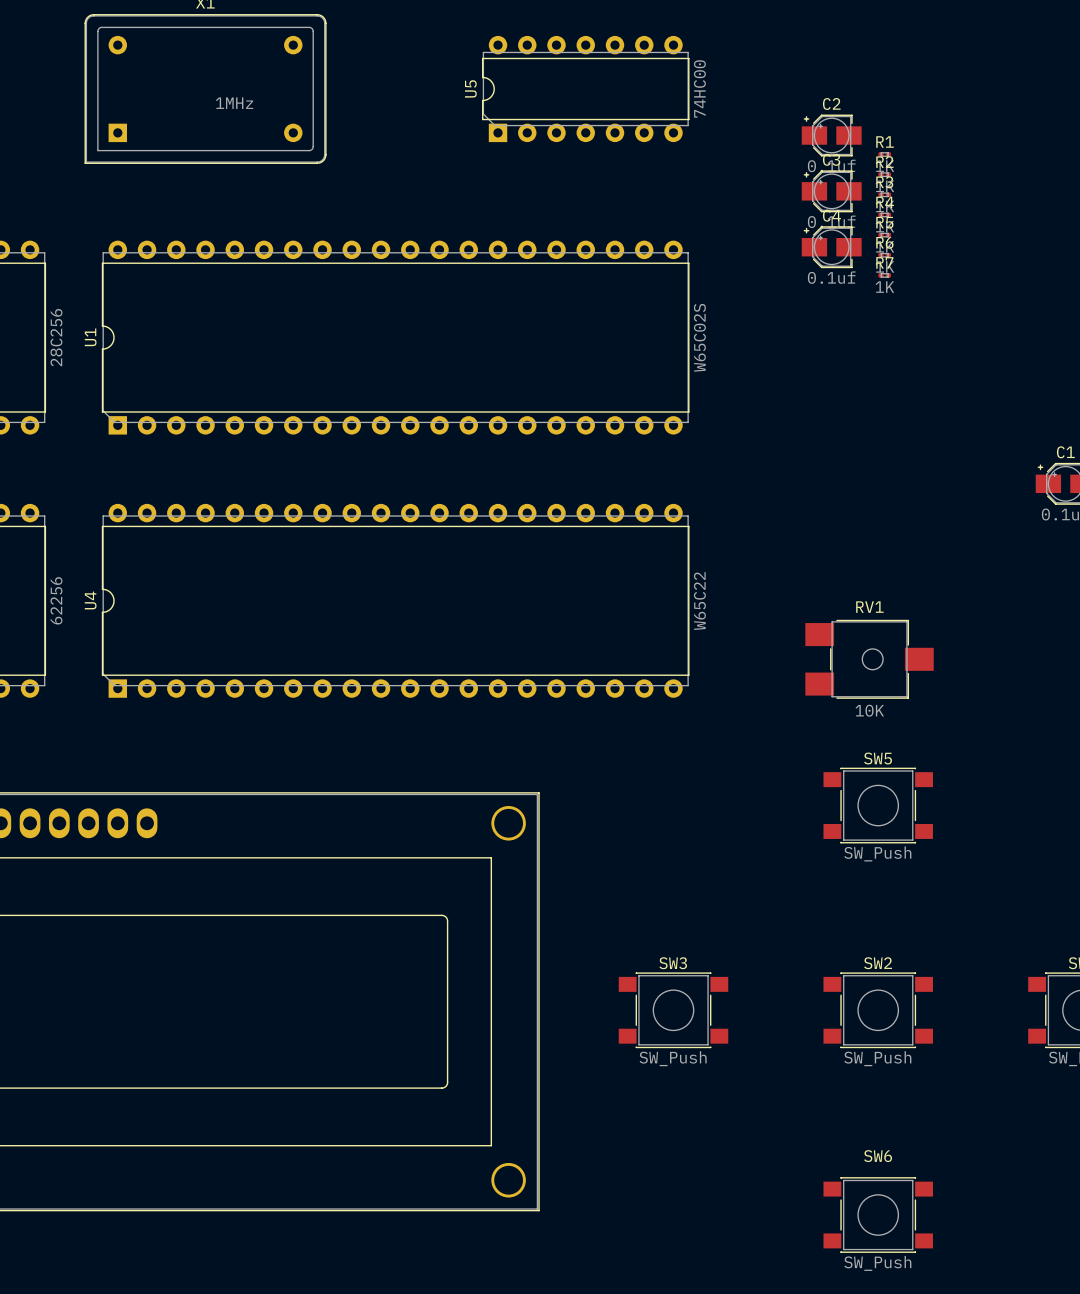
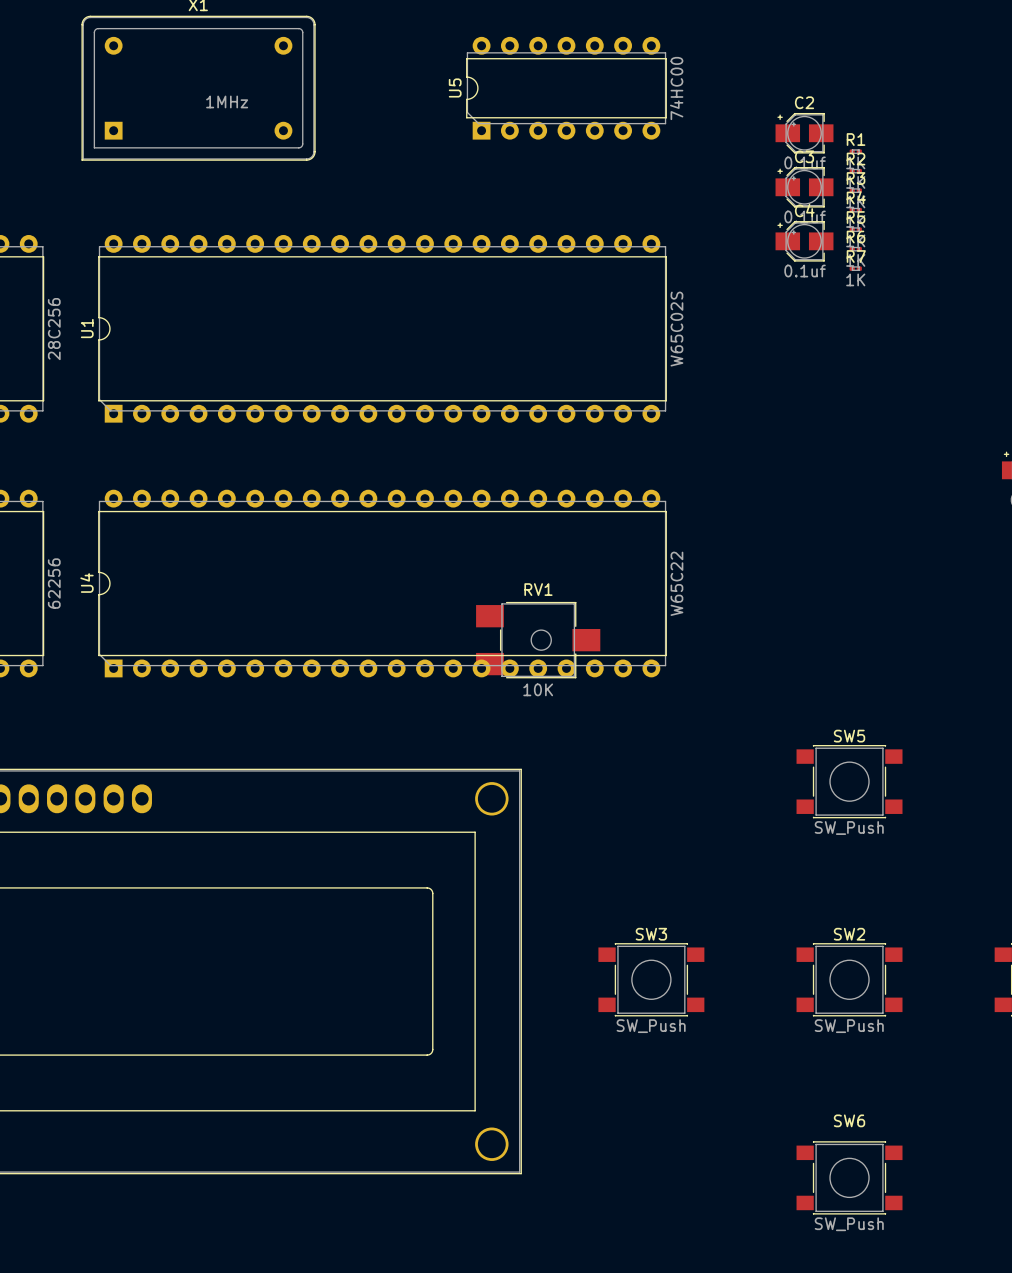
RV1 position: (869, 659) -> (538, 640)

